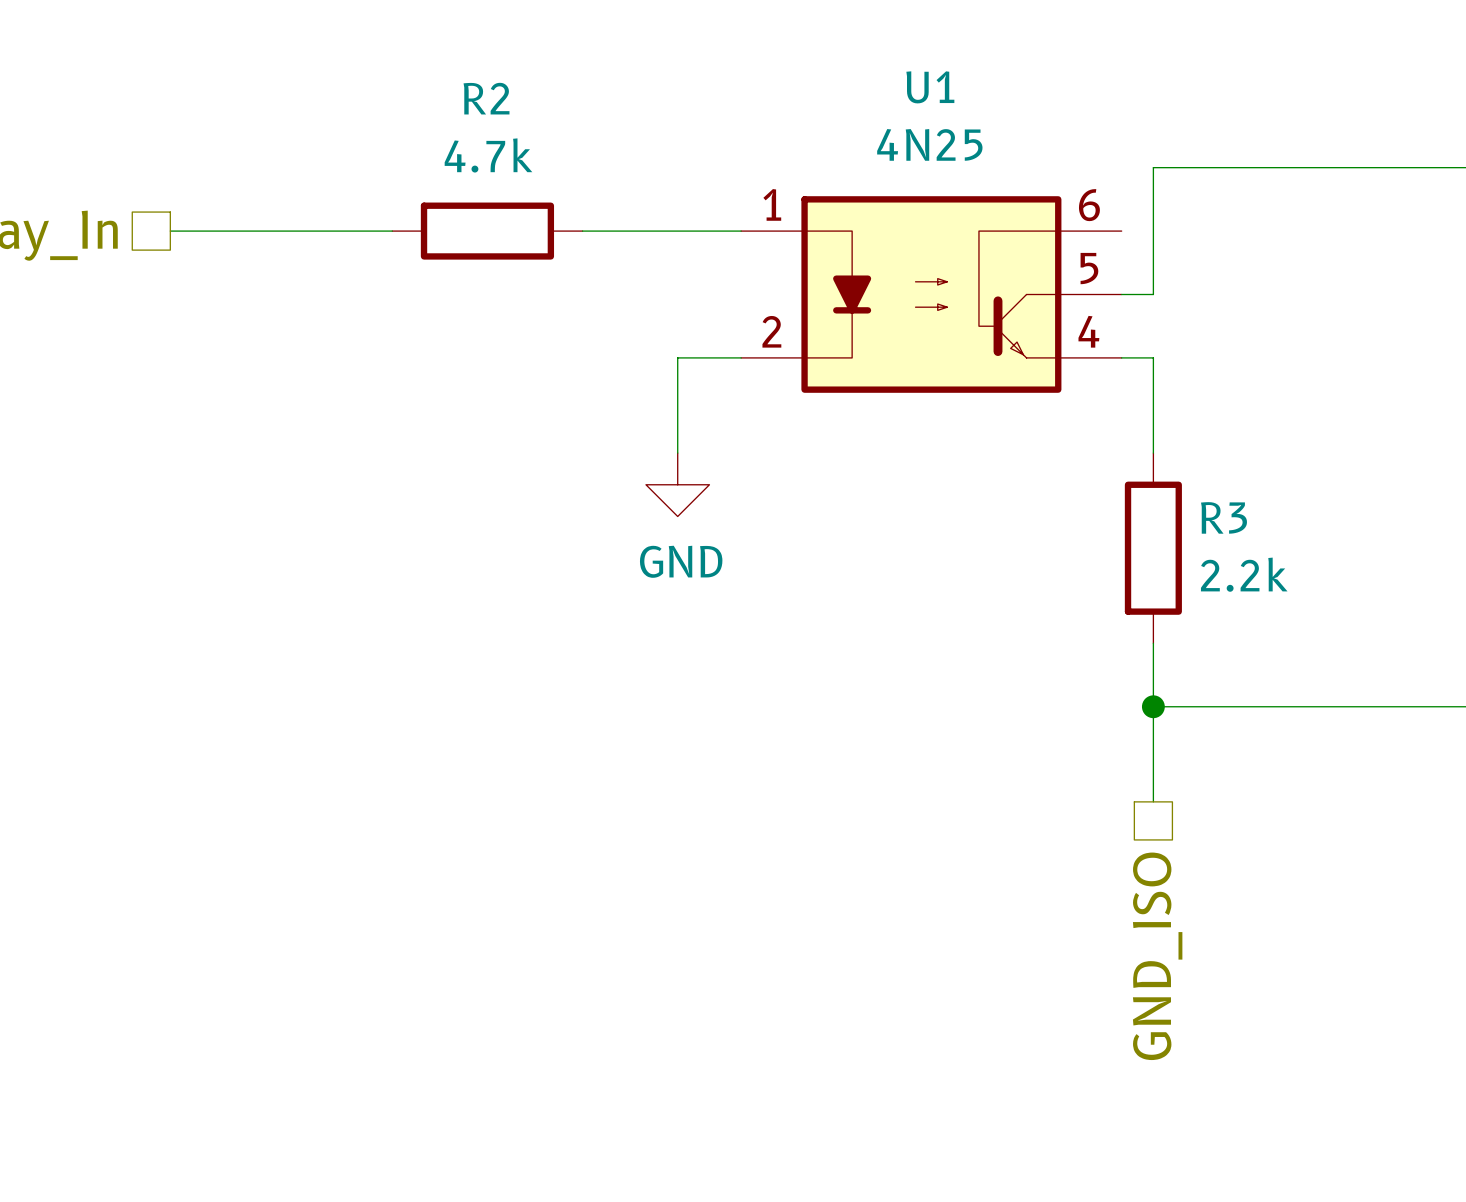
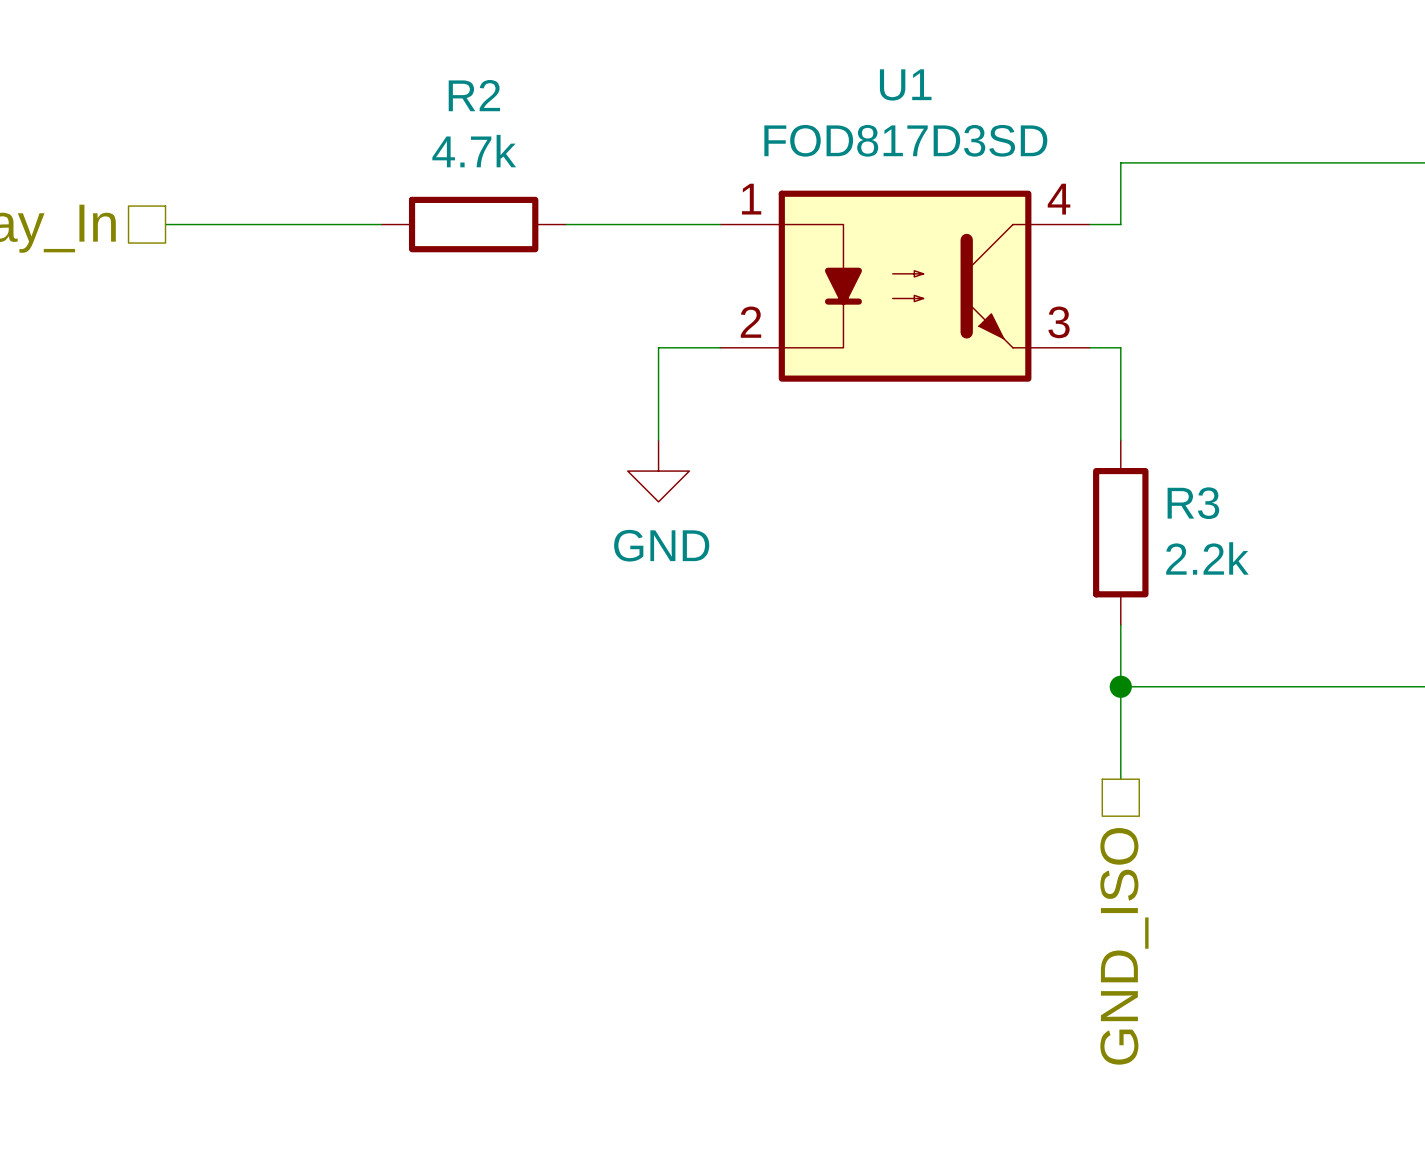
U1 value: 4N25 (929, 144) -> FOD817D3SD (905, 140)
U1 symbol: [741, 196, 1122, 393] -> [720, 190, 1090, 382]
wire: (1153, 231) (1153, 294) (1121, 294) -> (1120, 224) (1089, 224)

